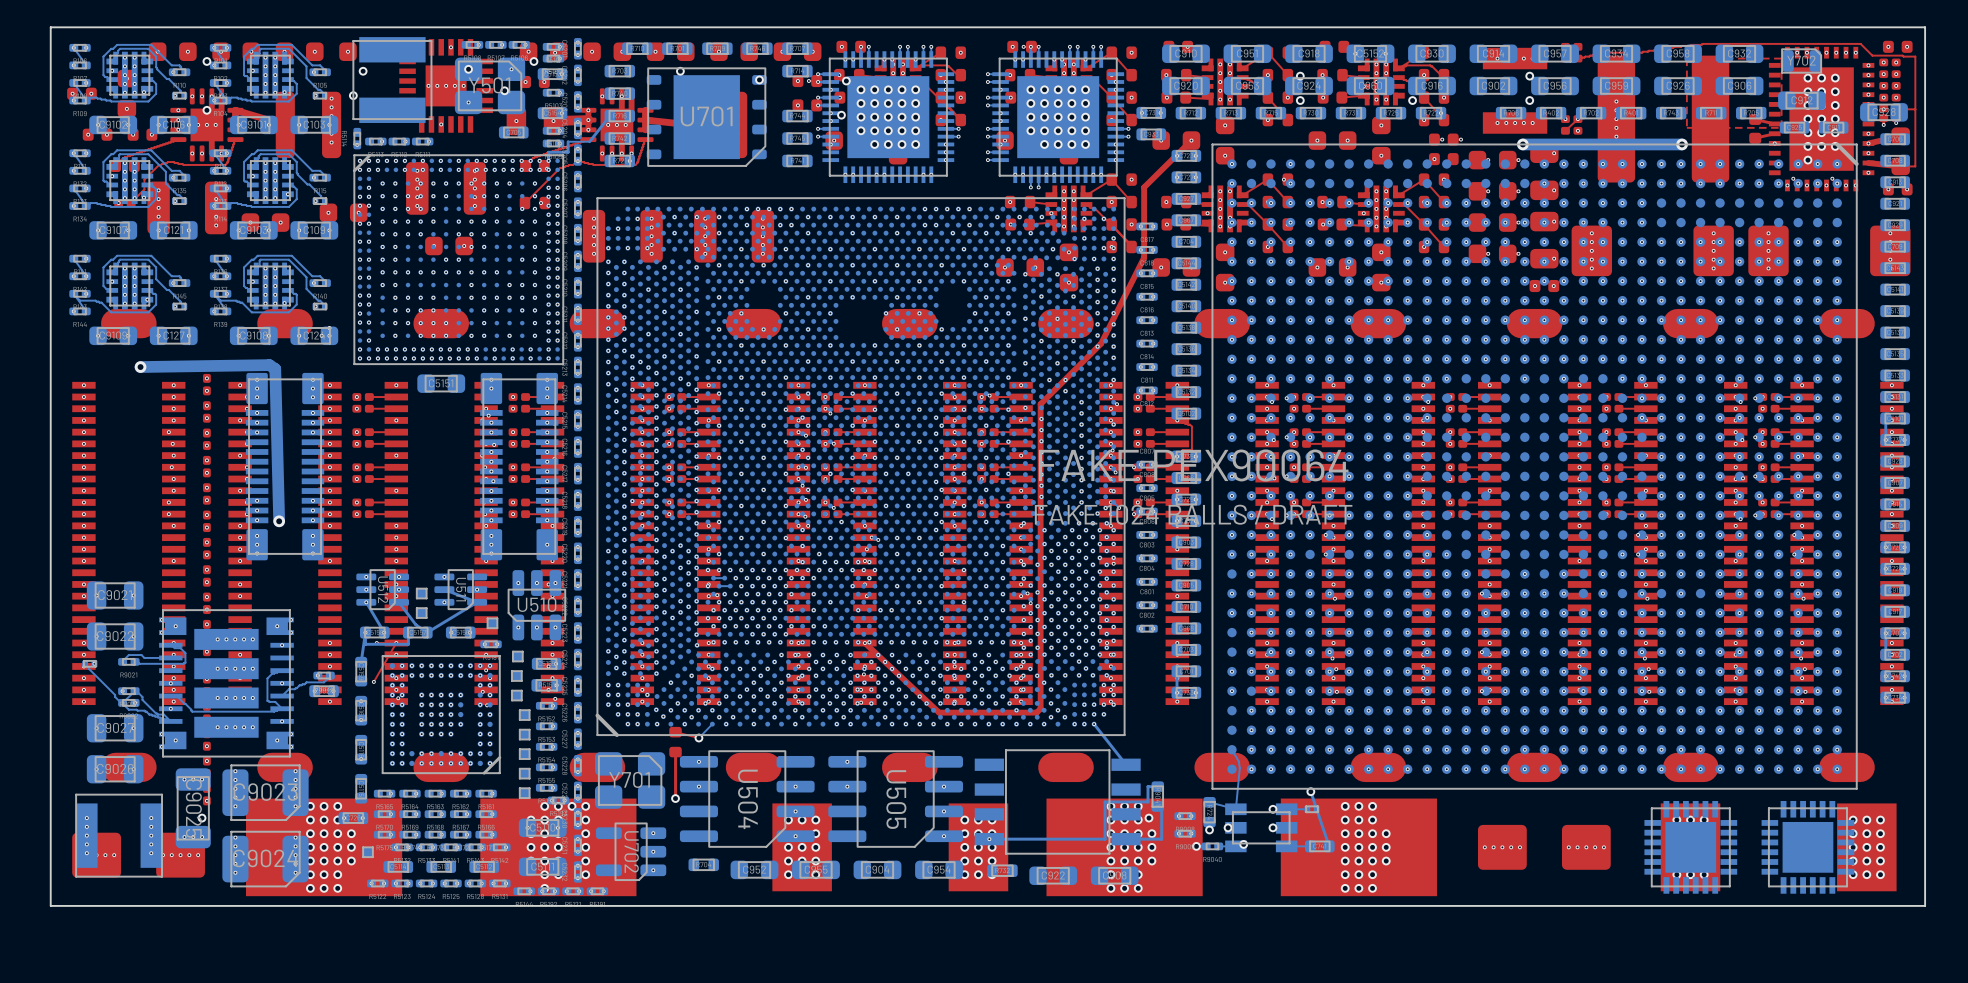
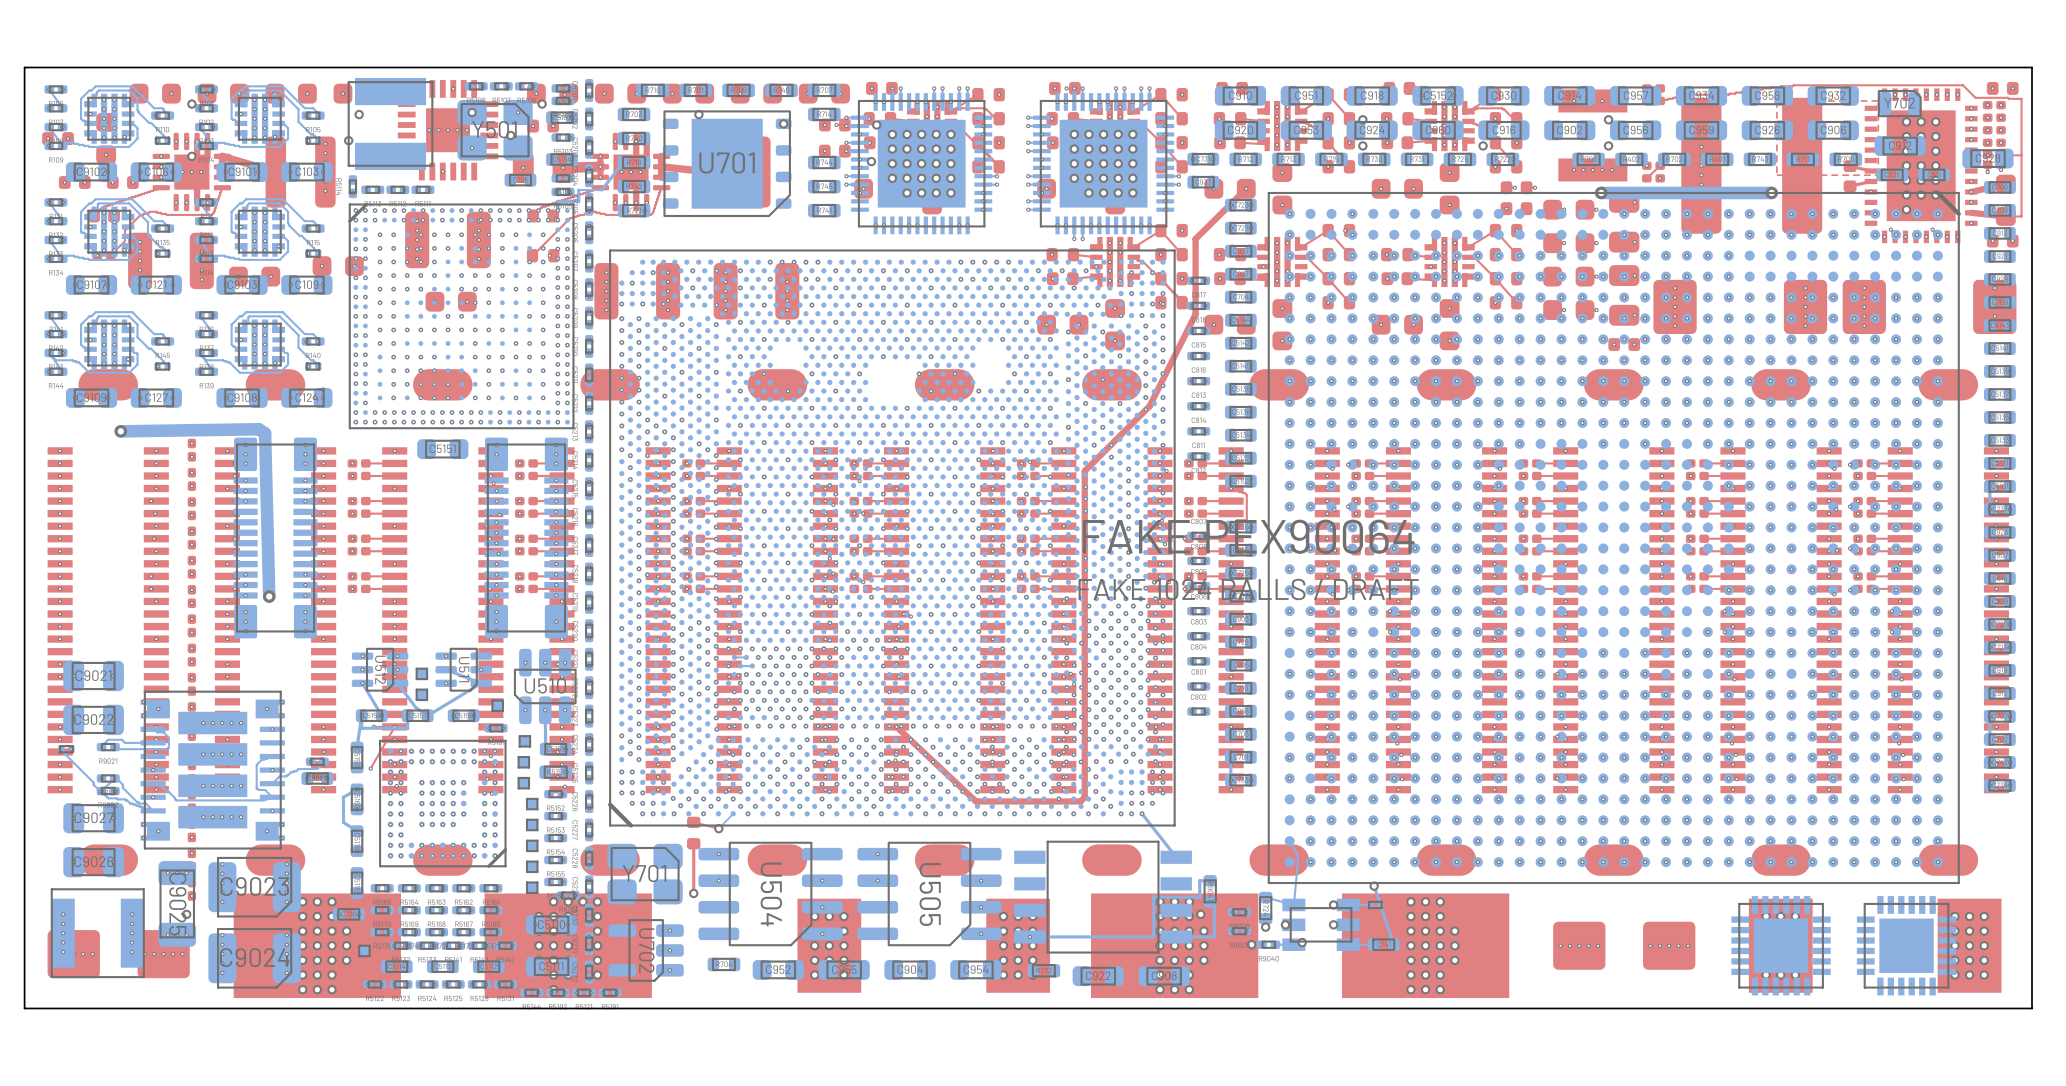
bottom track: none -> (545, 710) (545, 749)
bottom track: none -> (357, 789) (343, 797) (343, 822) (357, 831)

